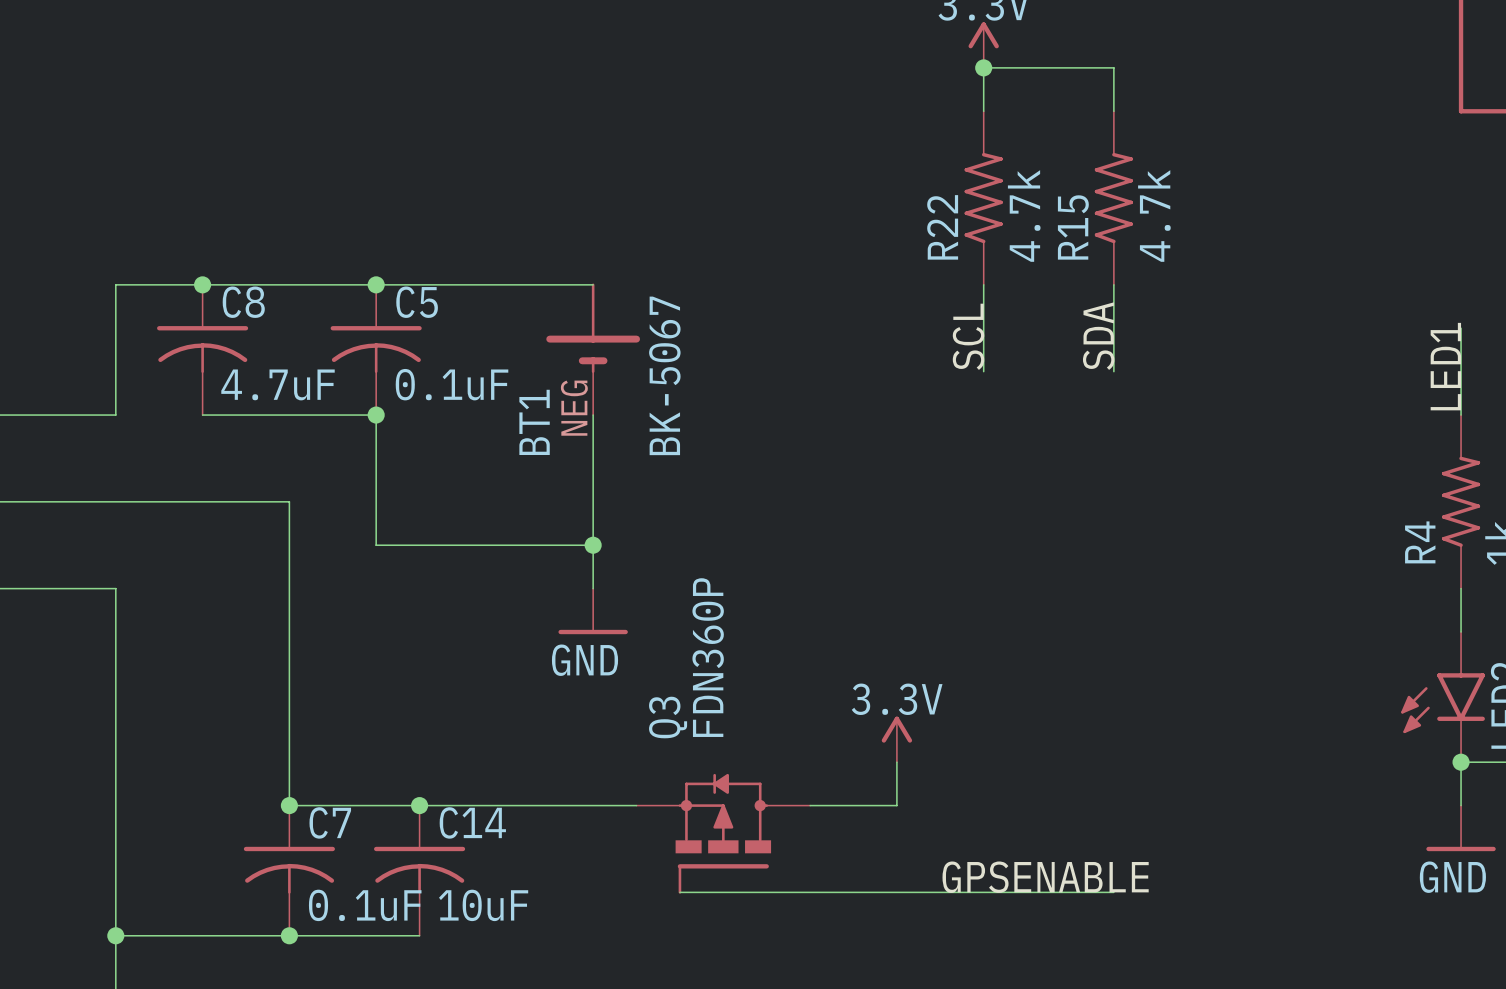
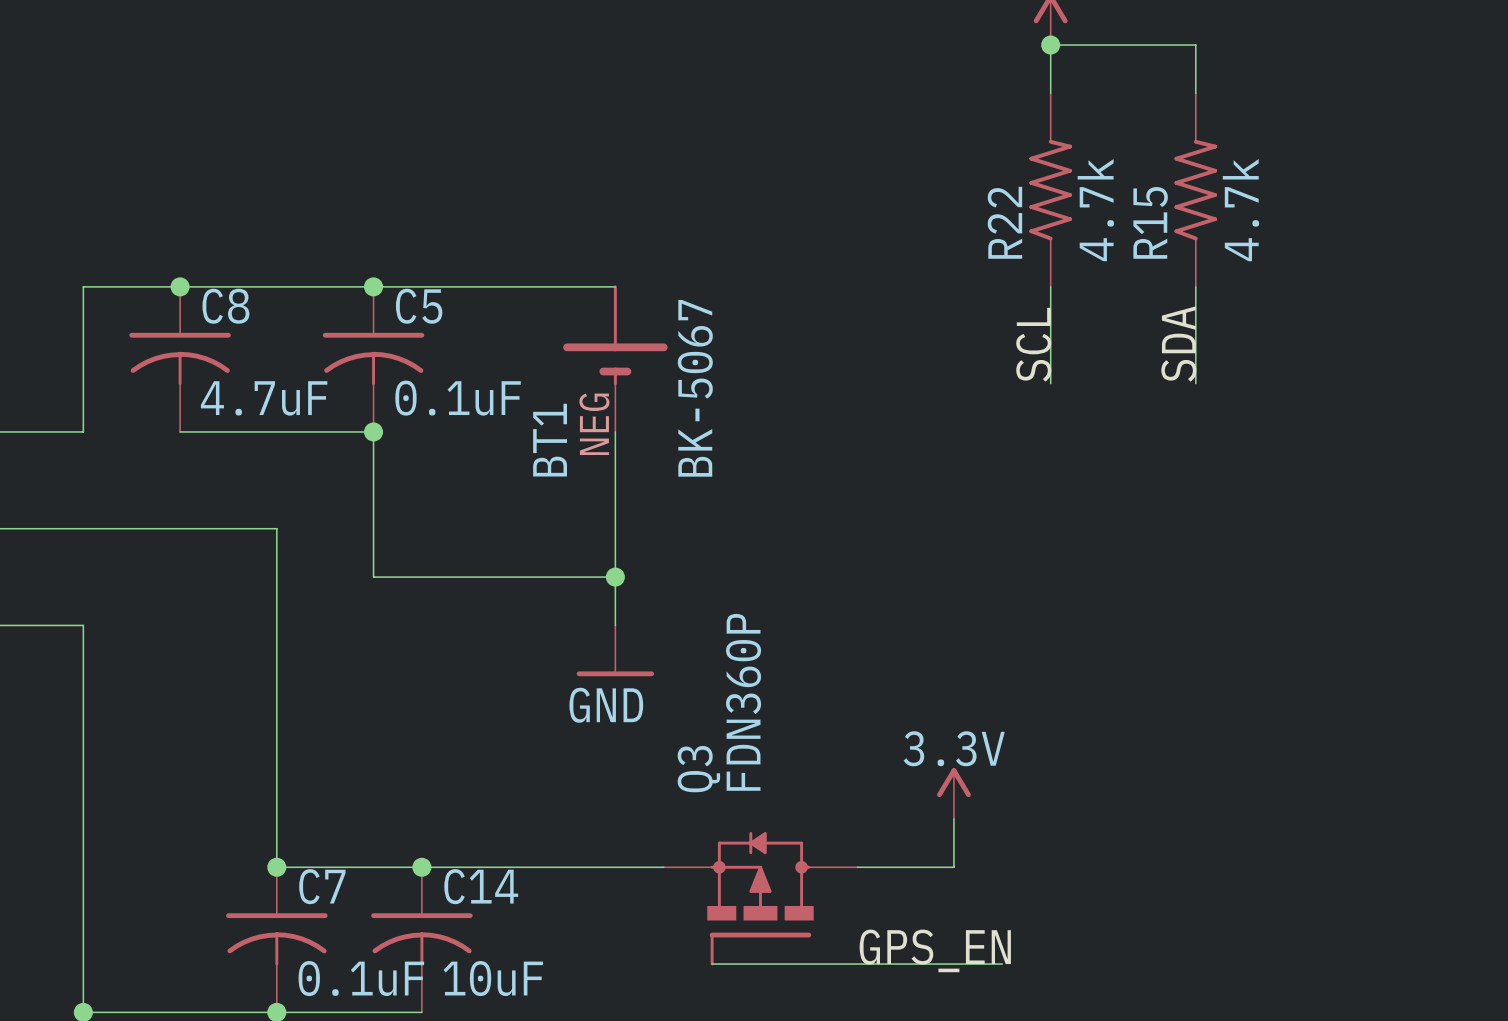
label: GPSENABLE (1045, 877) -> GPS_EN (935, 950)
wire: (940, 892) (1113, 892) -> none

